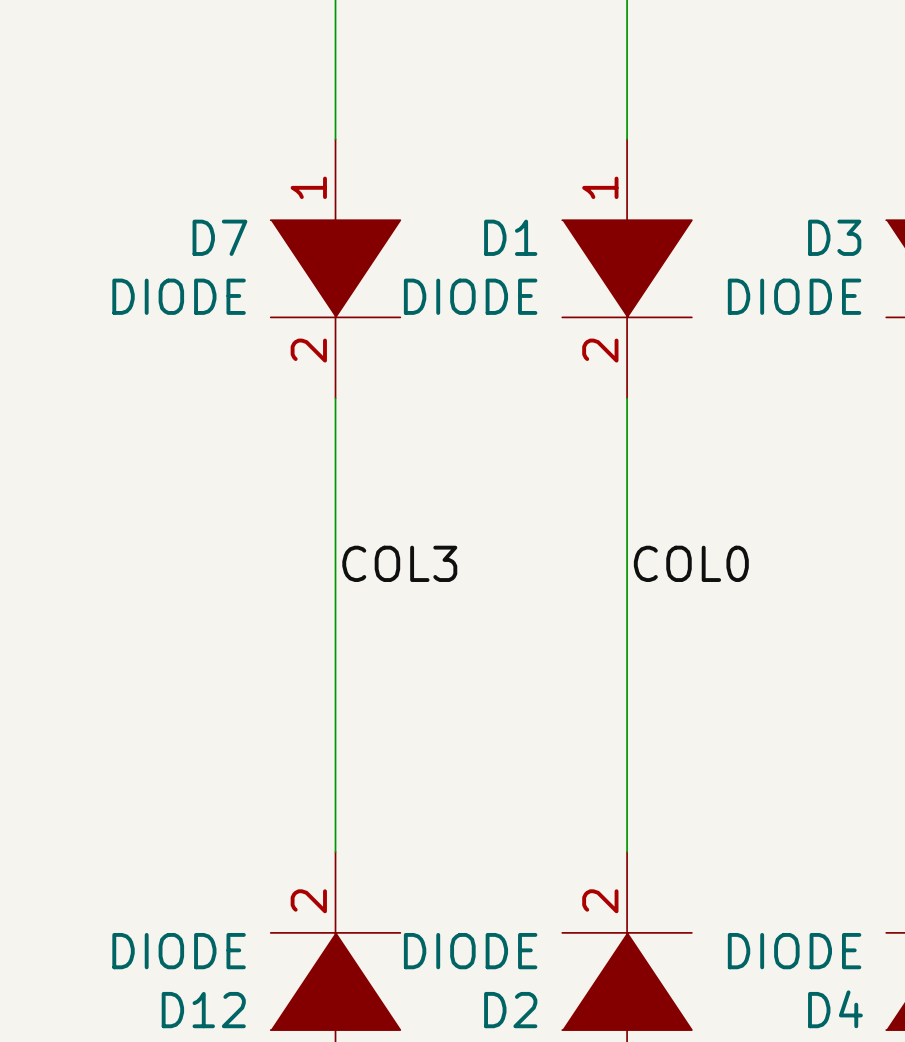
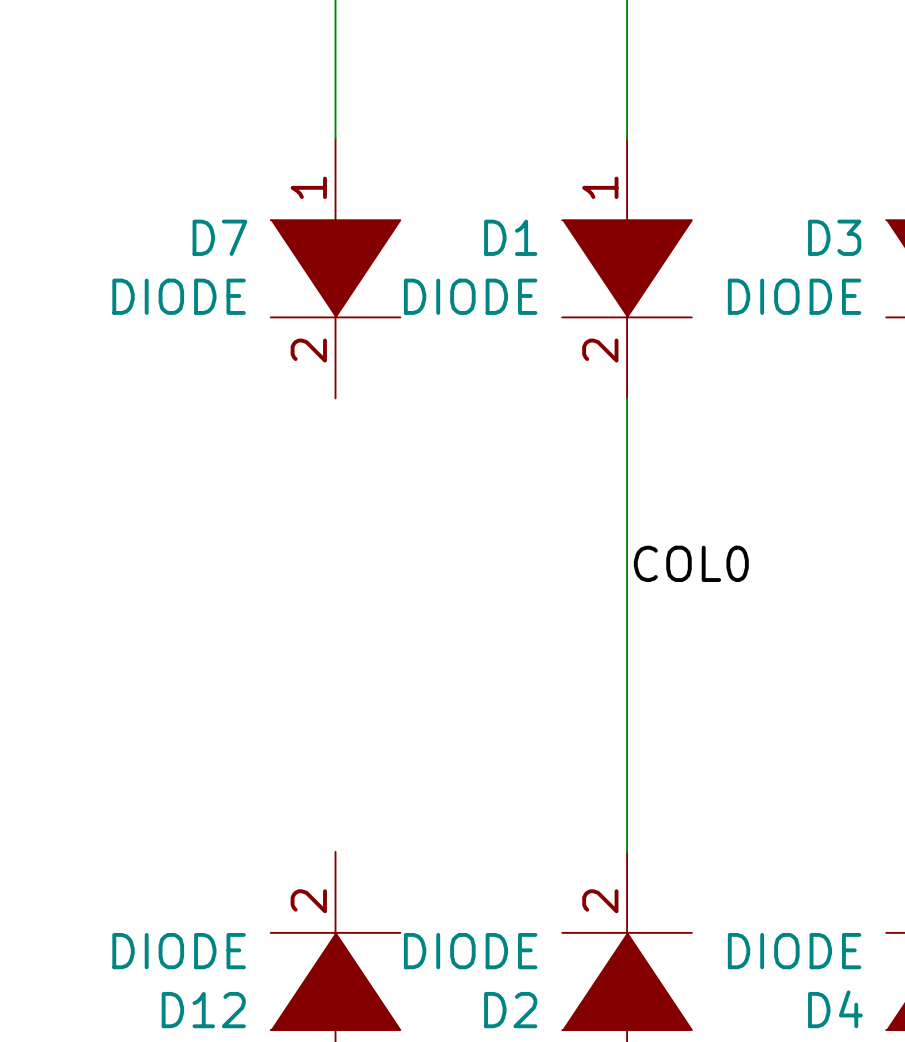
wire: (335, 398) (335, 851) -> none
label: COL3 (399, 563) -> none

